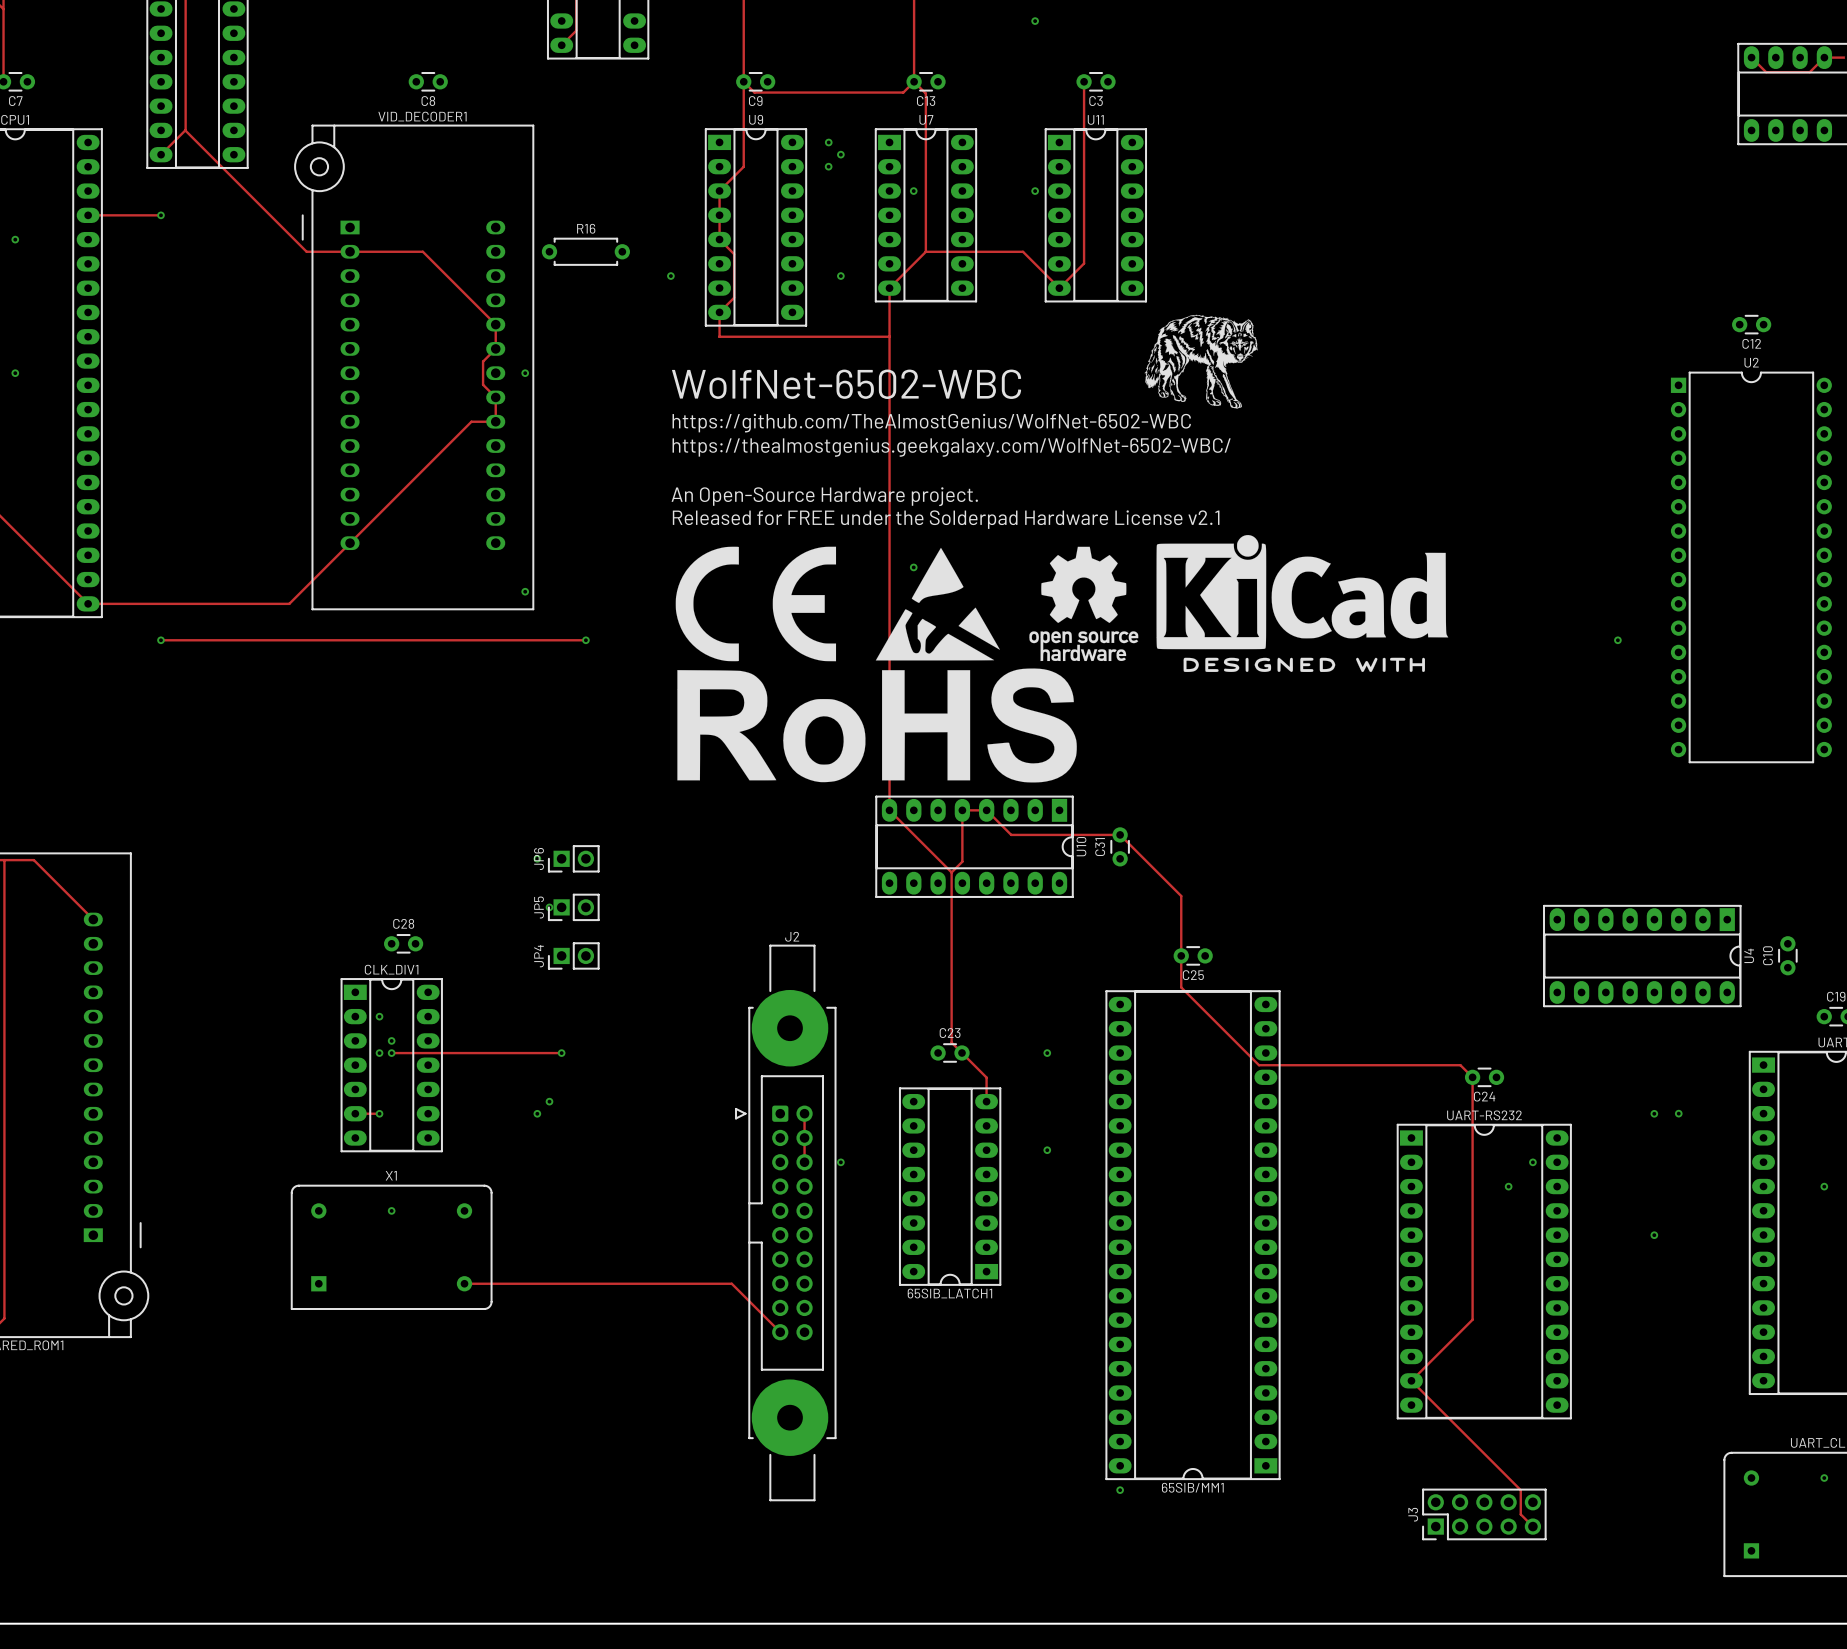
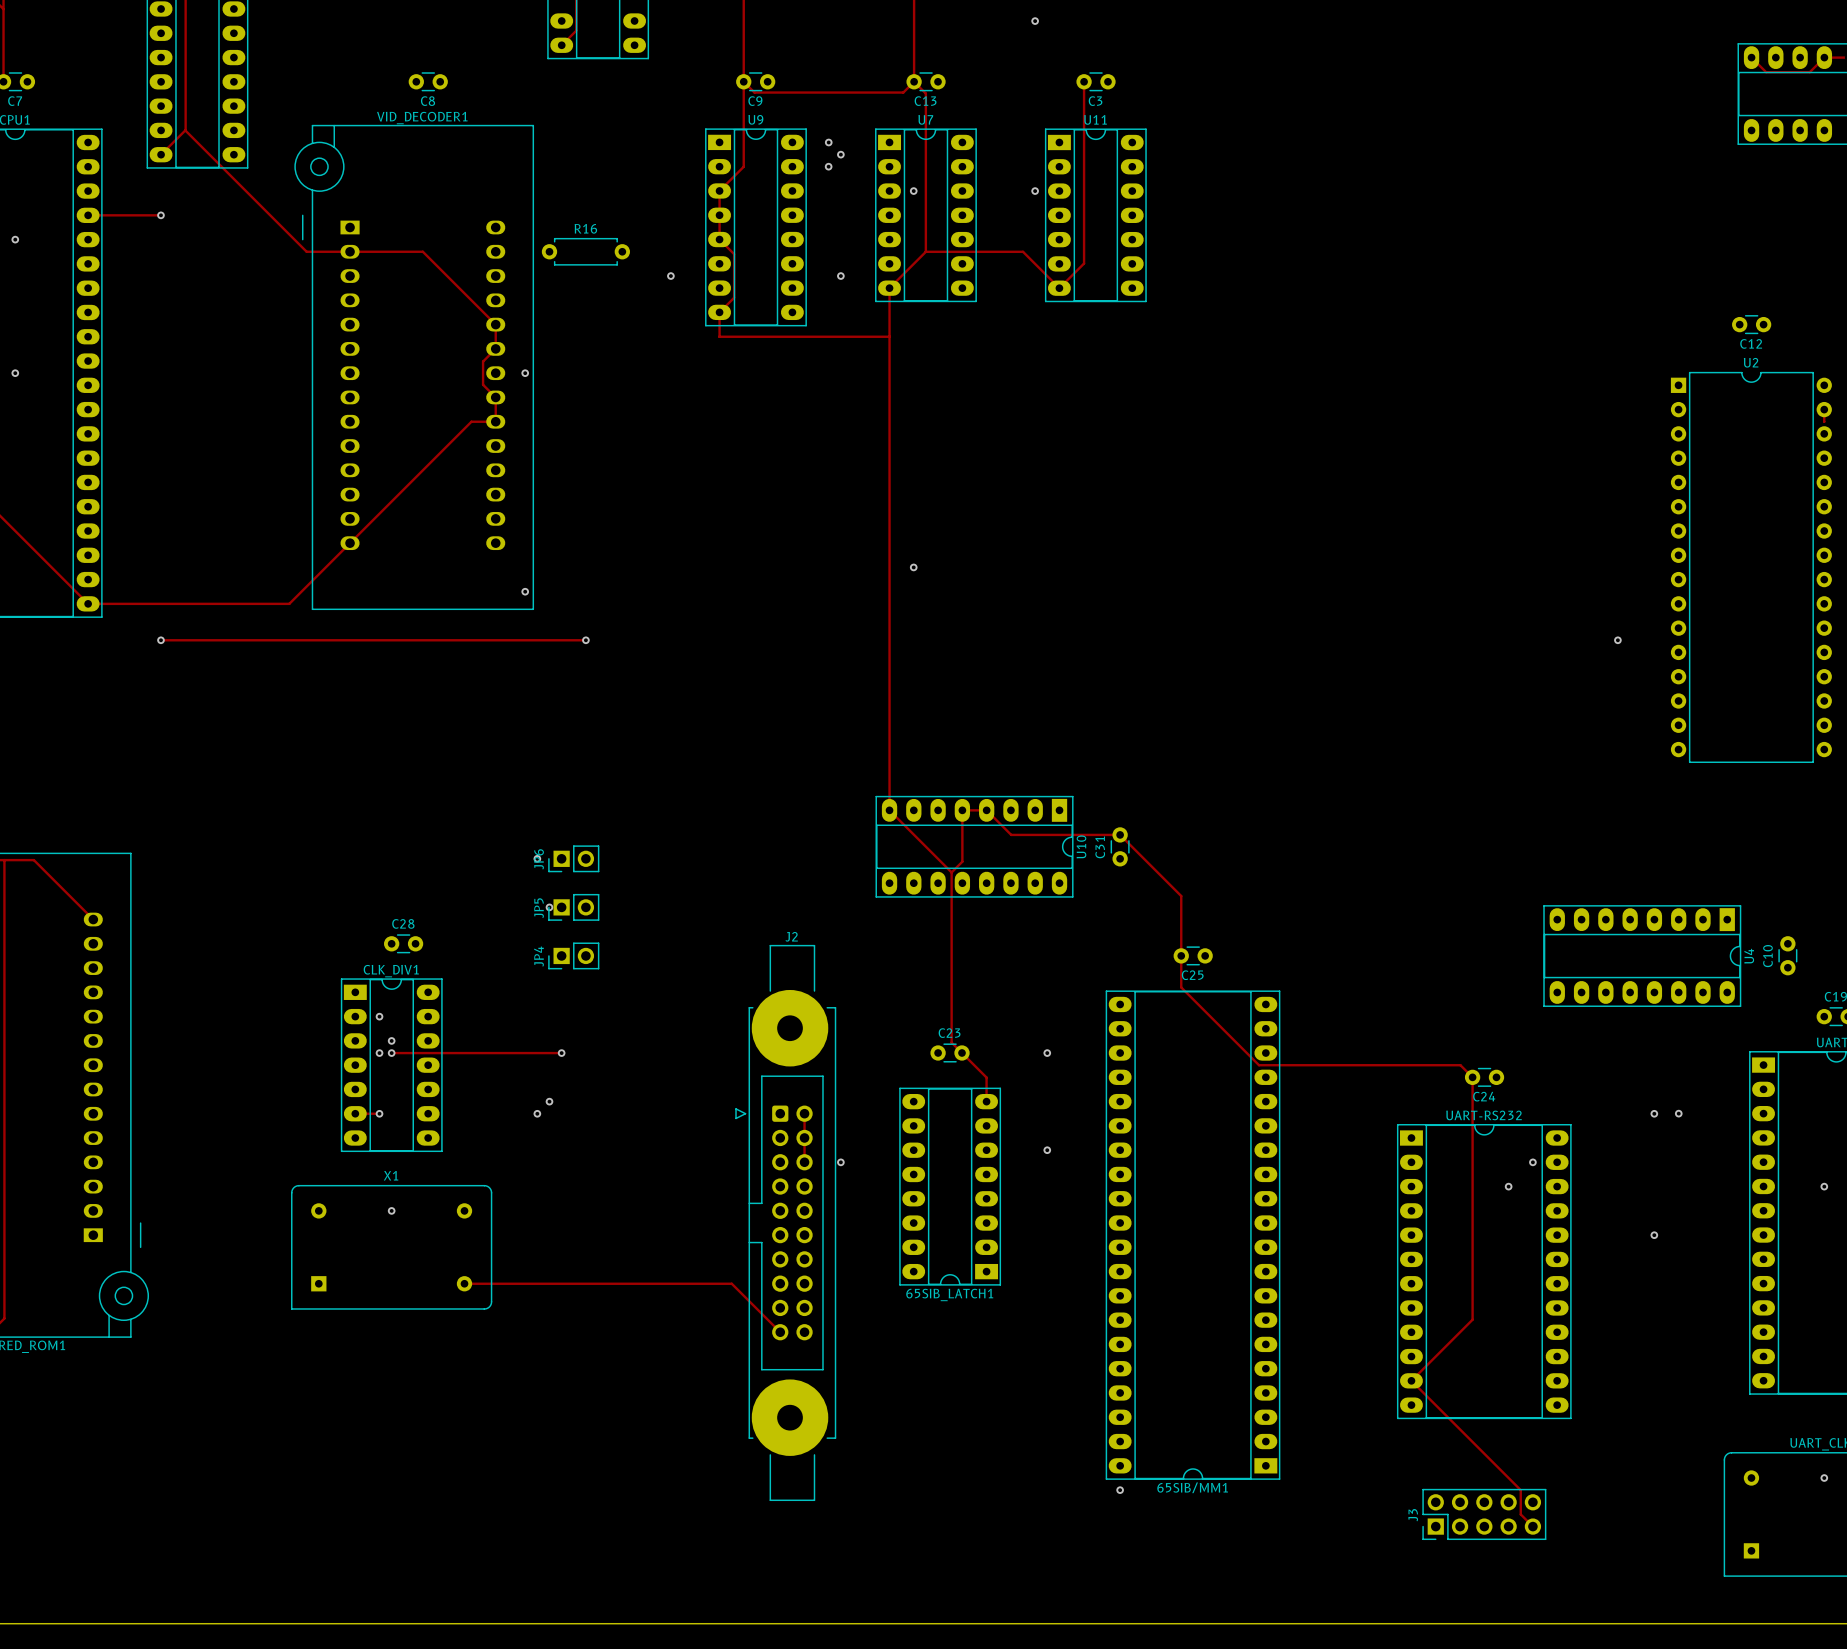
drawing: [1144, 314, 1258, 409] -> none
text: WolfNet-6502-WBC (846, 384) -> none
track: none -> (1824, 409) (1824, 421)
text: https://github.com/TheAlmostGenius/WolfNet-6502-WBC (931, 423) -> none
text: https://thealmostgenius.geekgalaxy.com/WolfNet-6502-WBC/ (951, 447) -> none
text: An Open-Source Hardware project. (824, 496) -> none
text: Released for FREE under the Solderpad Hardware License v2.1 (946, 519) -> none
drawing: [1156, 535, 1449, 672] -> none
drawing: [675, 546, 1139, 783] -> none

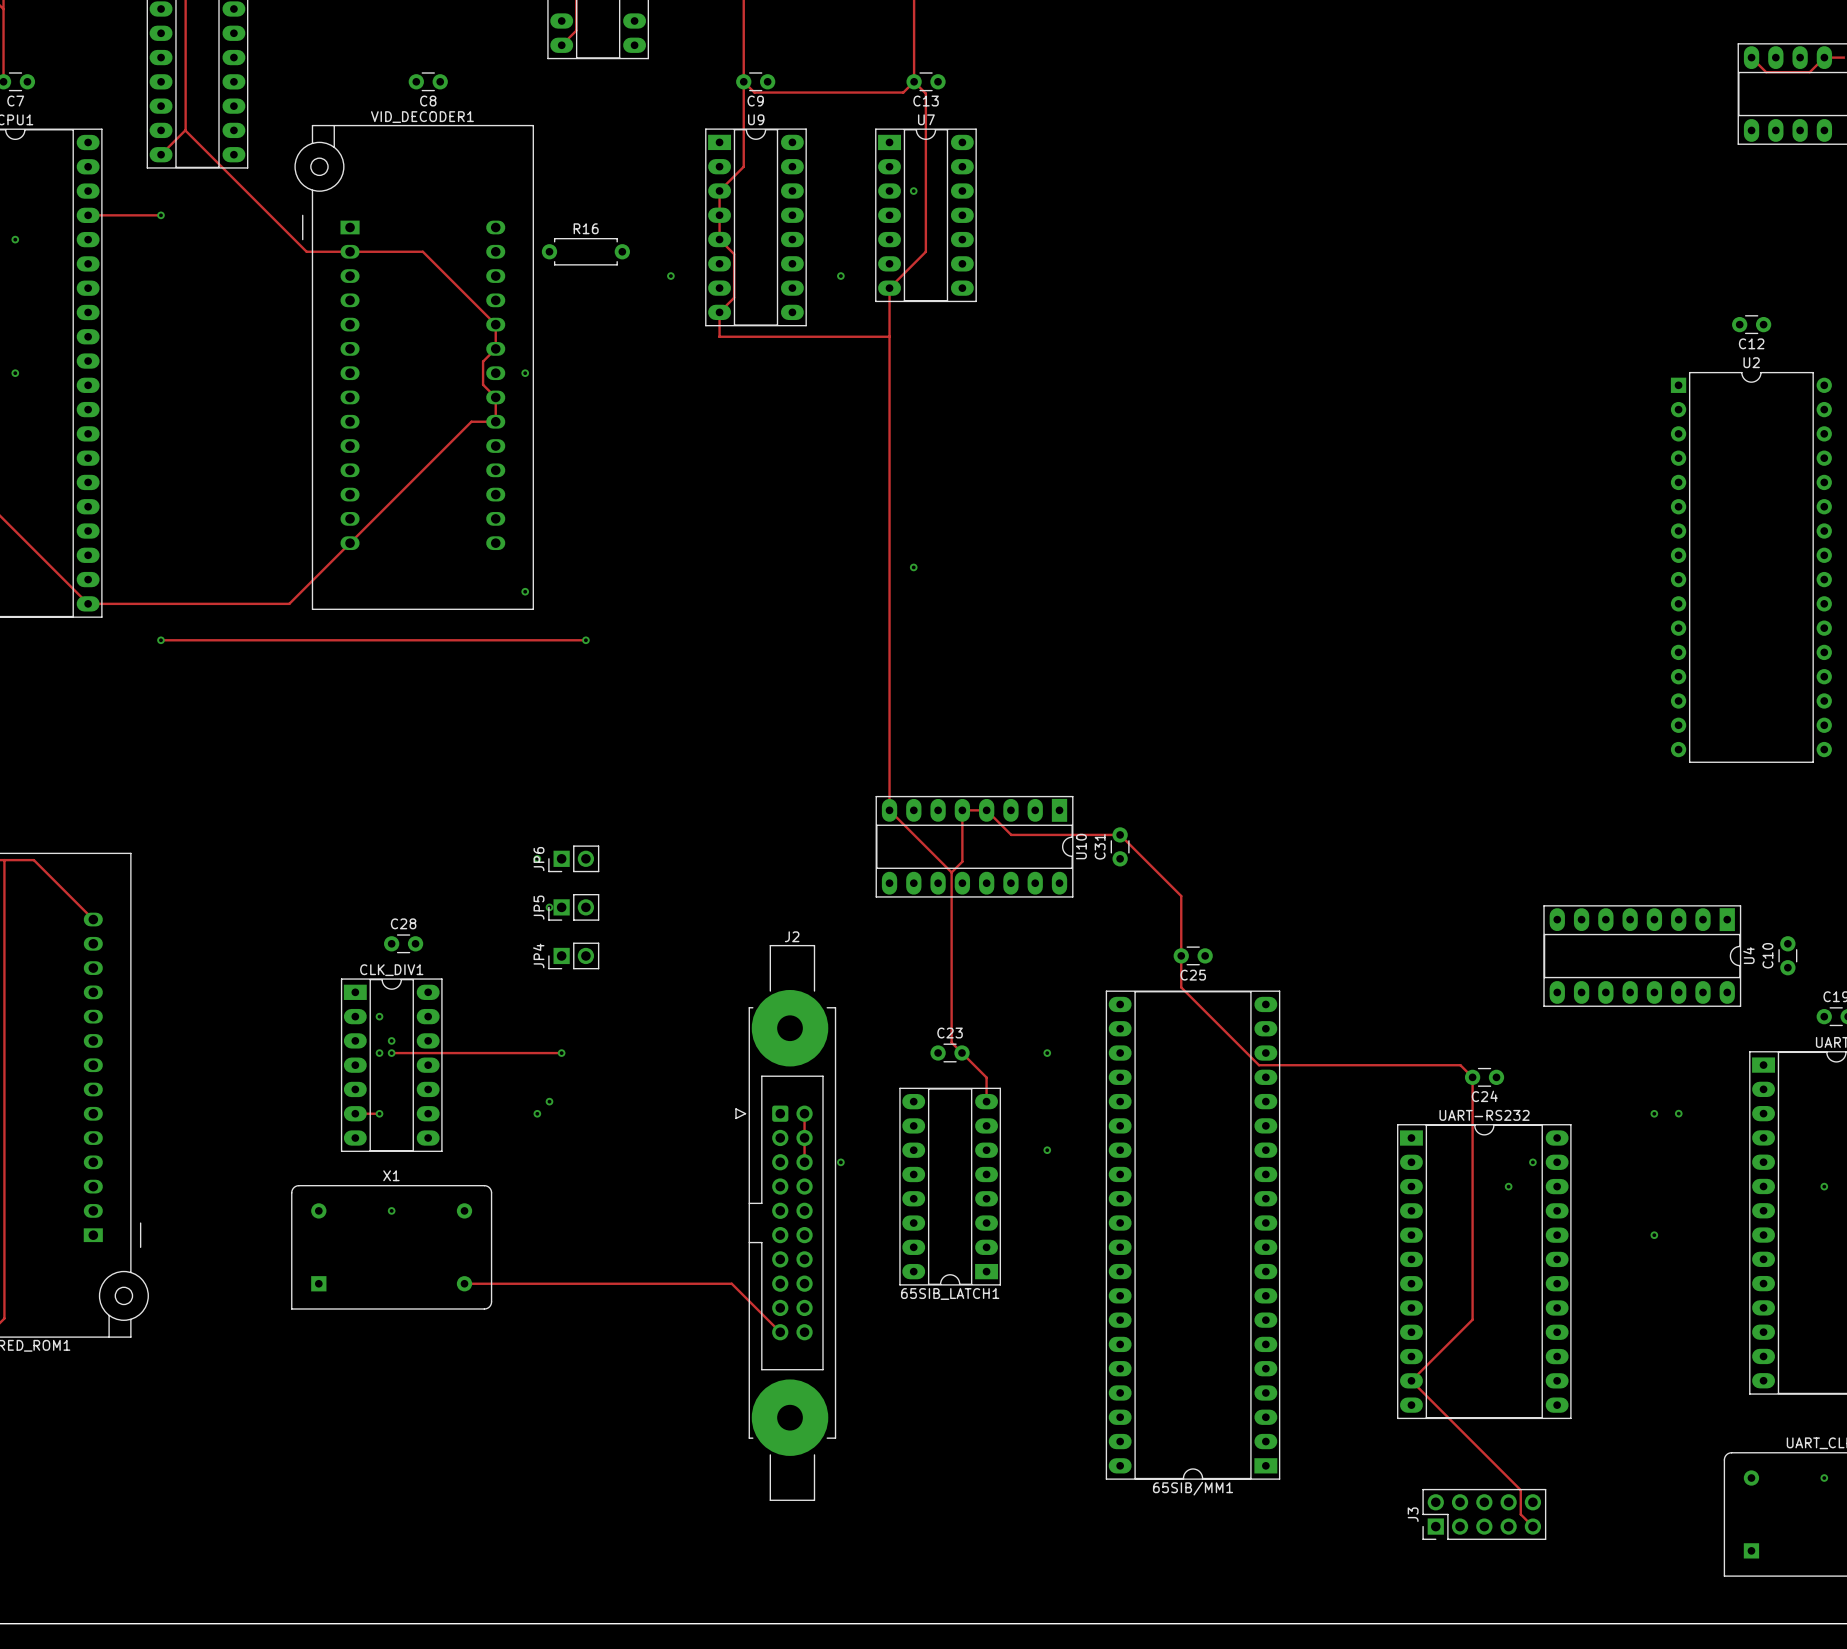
via: (1035, 21) -> none
track: (1084, 81) (1084, 263) (1059, 288) (1023, 251) (925, 251) -> none
C3: (1096, 81) -> none
via: (828, 142) -> none
via: (840, 154) -> none
via: (828, 166) -> none
via: (1035, 191) -> none
U11: (1095, 215) -> none
track: (1824, 409) (1824, 421) -> none
via: (1617, 640) -> none
via: (1120, 1490) -> none

